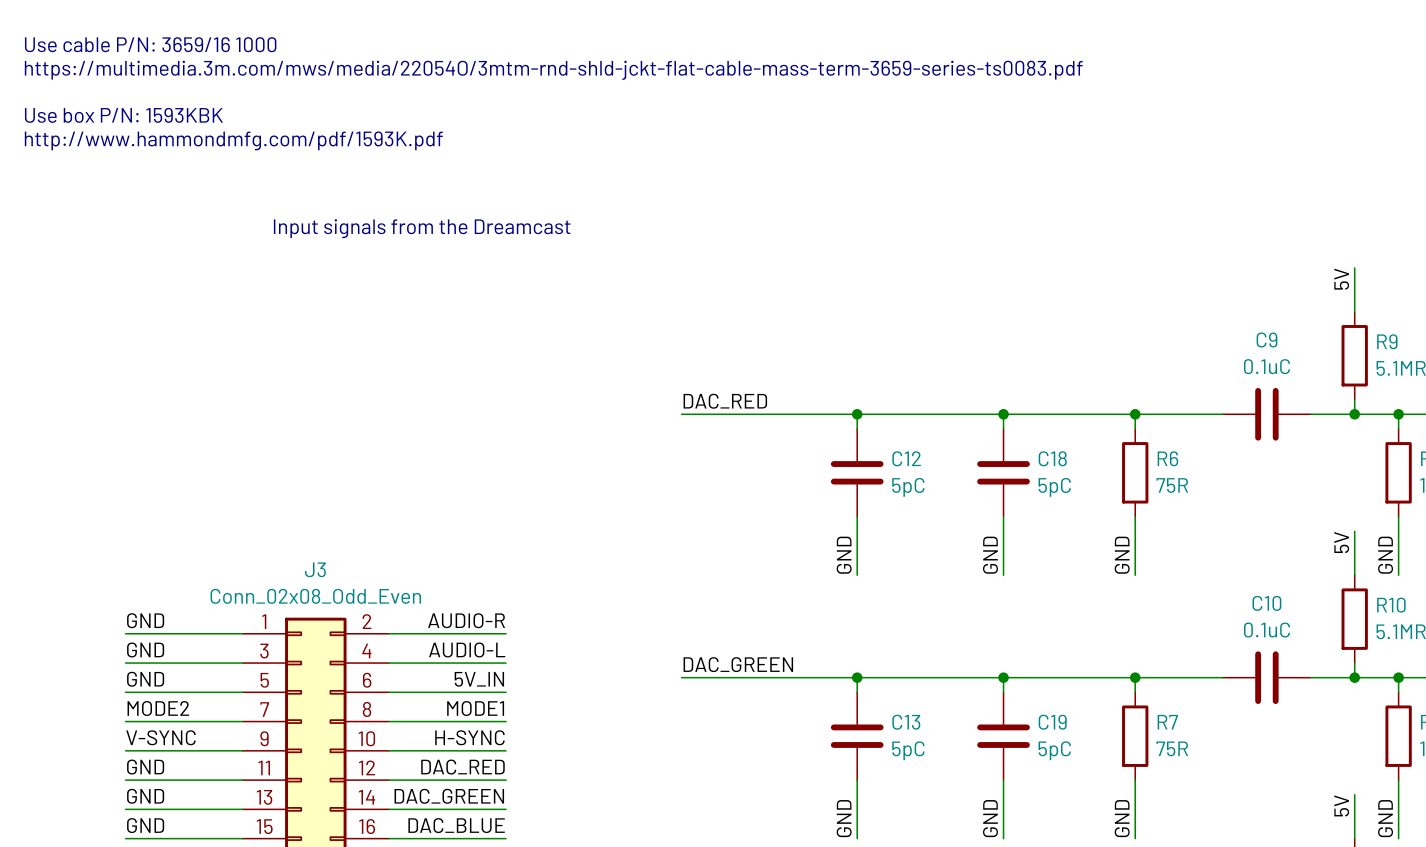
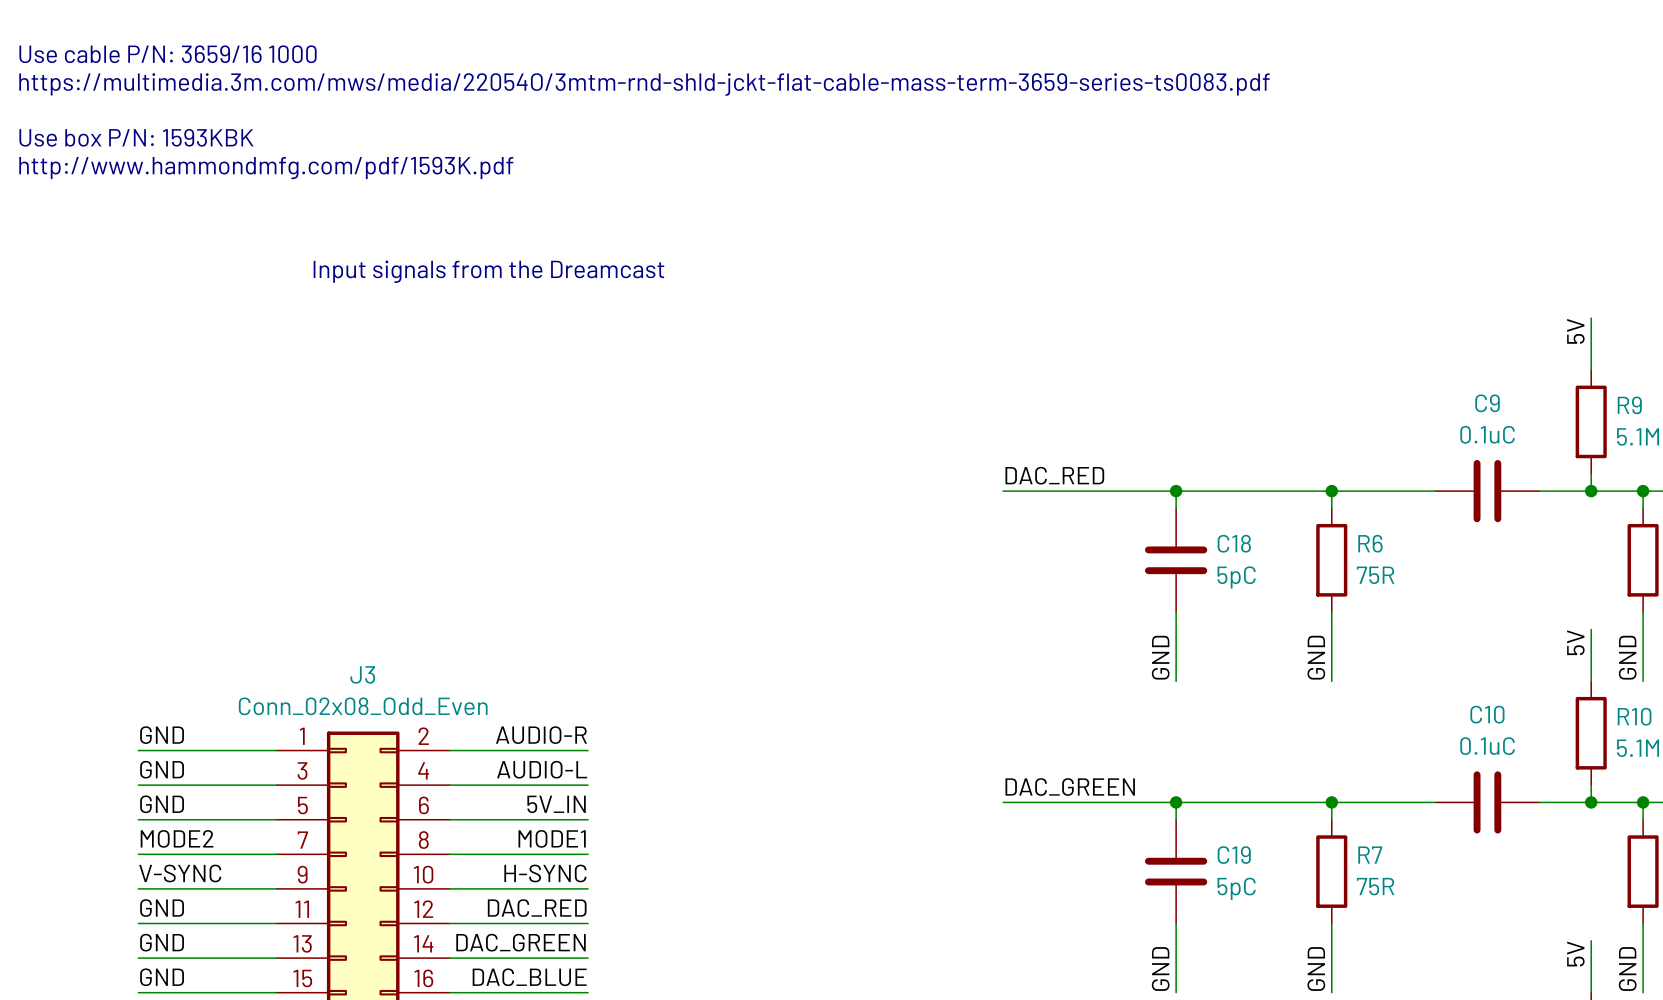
label position: DAC_RED (725, 401) -> DAC_RED (1054, 475)
wire: (681, 414) (857, 414) (857, 428) -> none
junction: (857, 414) -> none
C12: 5pC (857, 472) -> none
wire: (857, 516) (857, 575) -> none
label: GND (844, 555) -> none
label position: DAC_GREEN (738, 664) -> DAC_GREEN (1070, 787)
wire: (681, 677) (857, 677) (857, 692) -> none
junction: (857, 677) -> none
C13: 5pC (857, 736) -> none
wire: (857, 780) (857, 838) -> none
label: GND (844, 818) -> none

